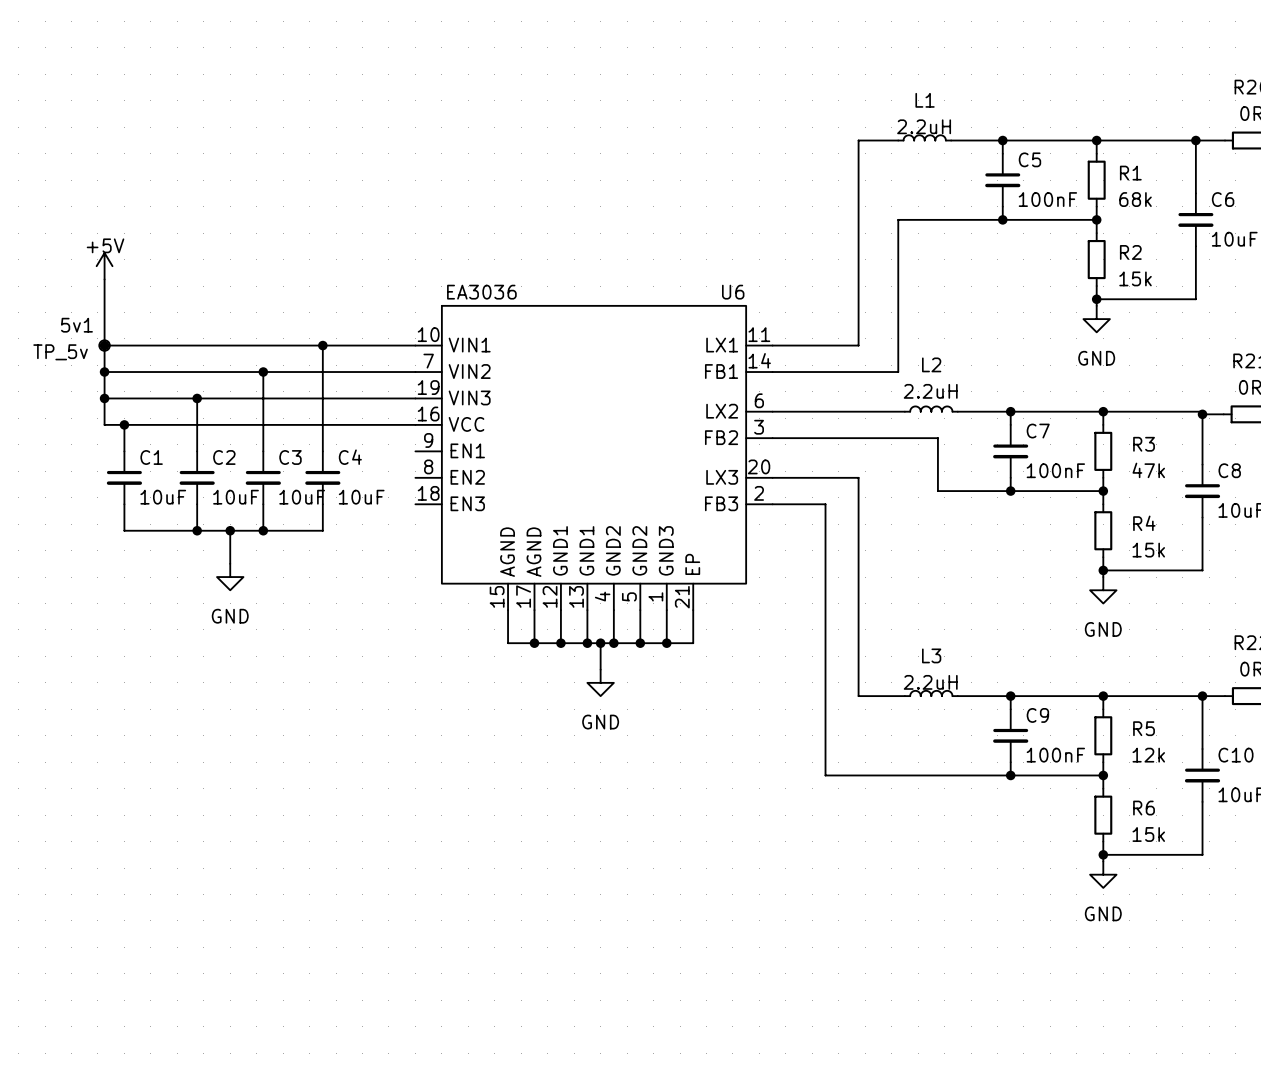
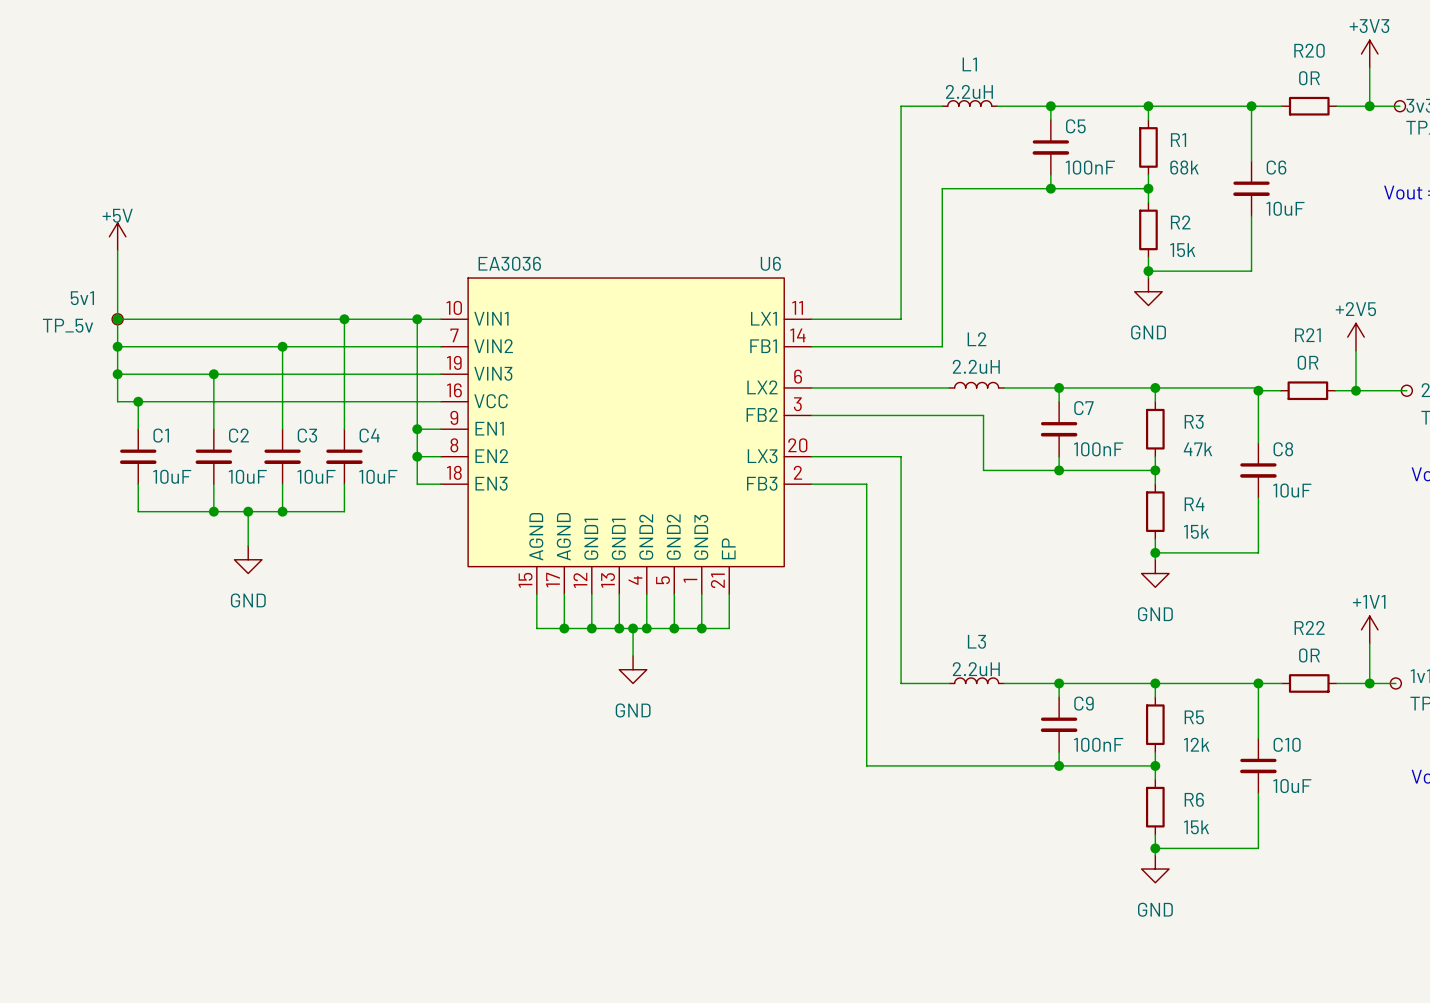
wire: none -> (417, 319) (417, 484) (440, 484)
junction: none -> (417, 319)
wire: none -> (417, 429) (440, 429)
junction: none -> (417, 429)
wire: none -> (417, 456) (440, 456)
junction: none -> (417, 456)

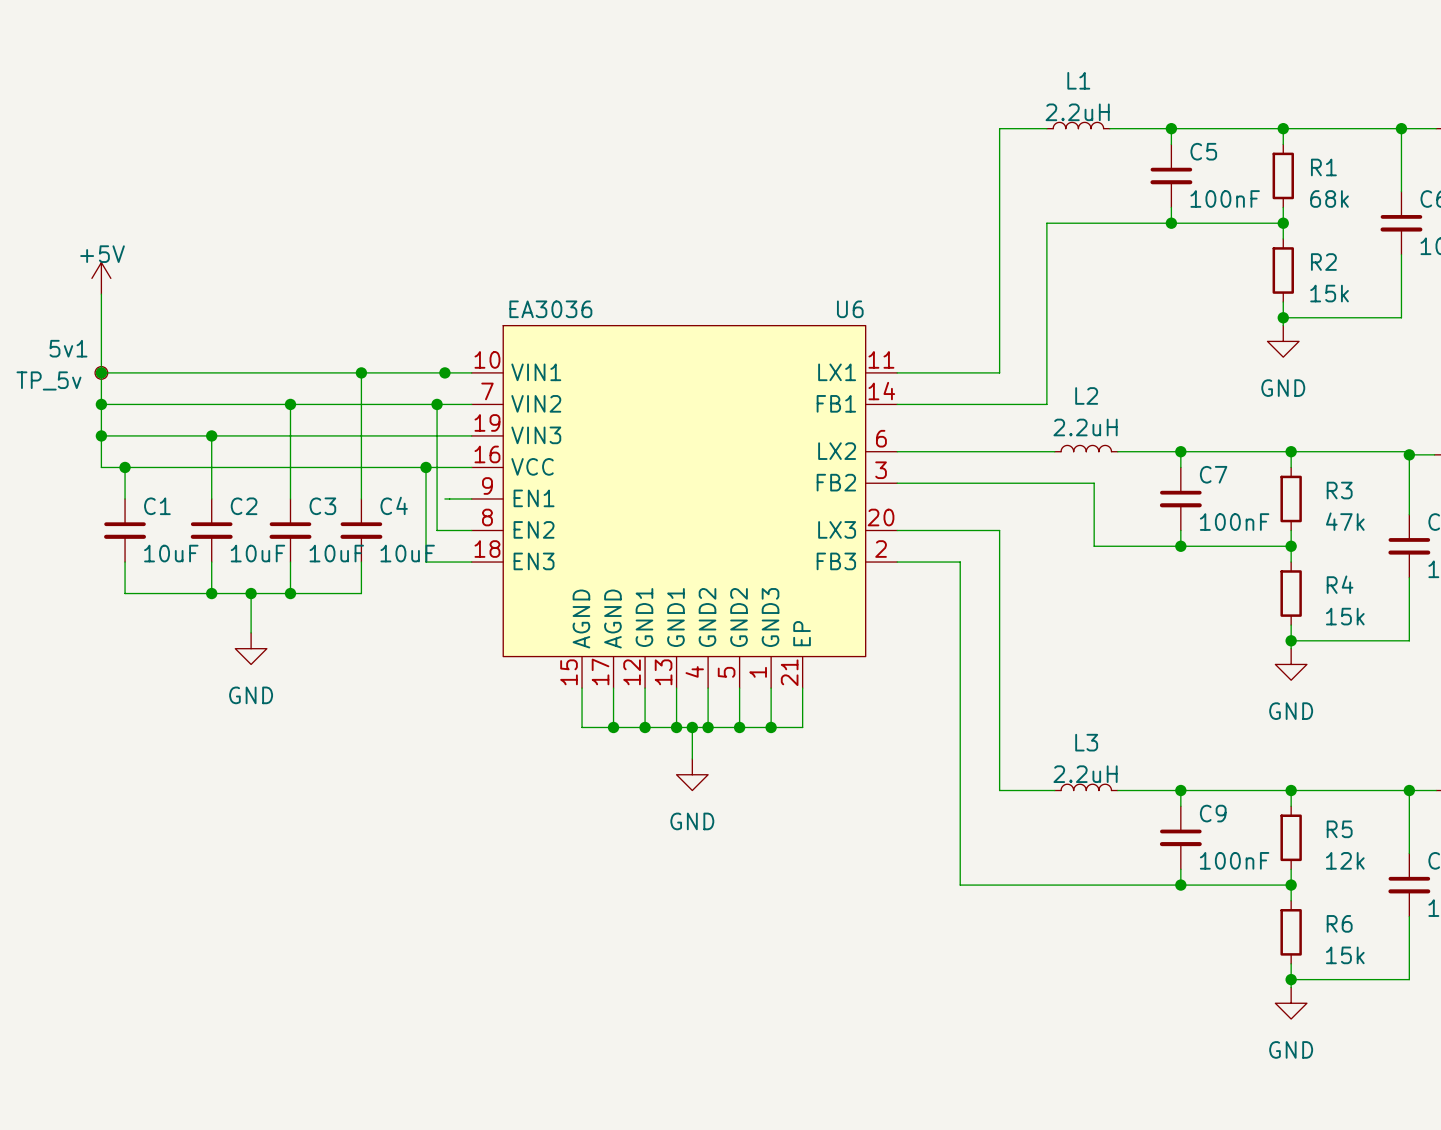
wire: (417, 319) (417, 484) -> (426, 467) (426, 562) (444, 562)
wire: none -> (437, 404) (437, 530) (444, 530)
junction: none -> (437, 404)
junction: none -> (426, 467)
junction: (417, 429) -> none
junction: (417, 456) -> none

